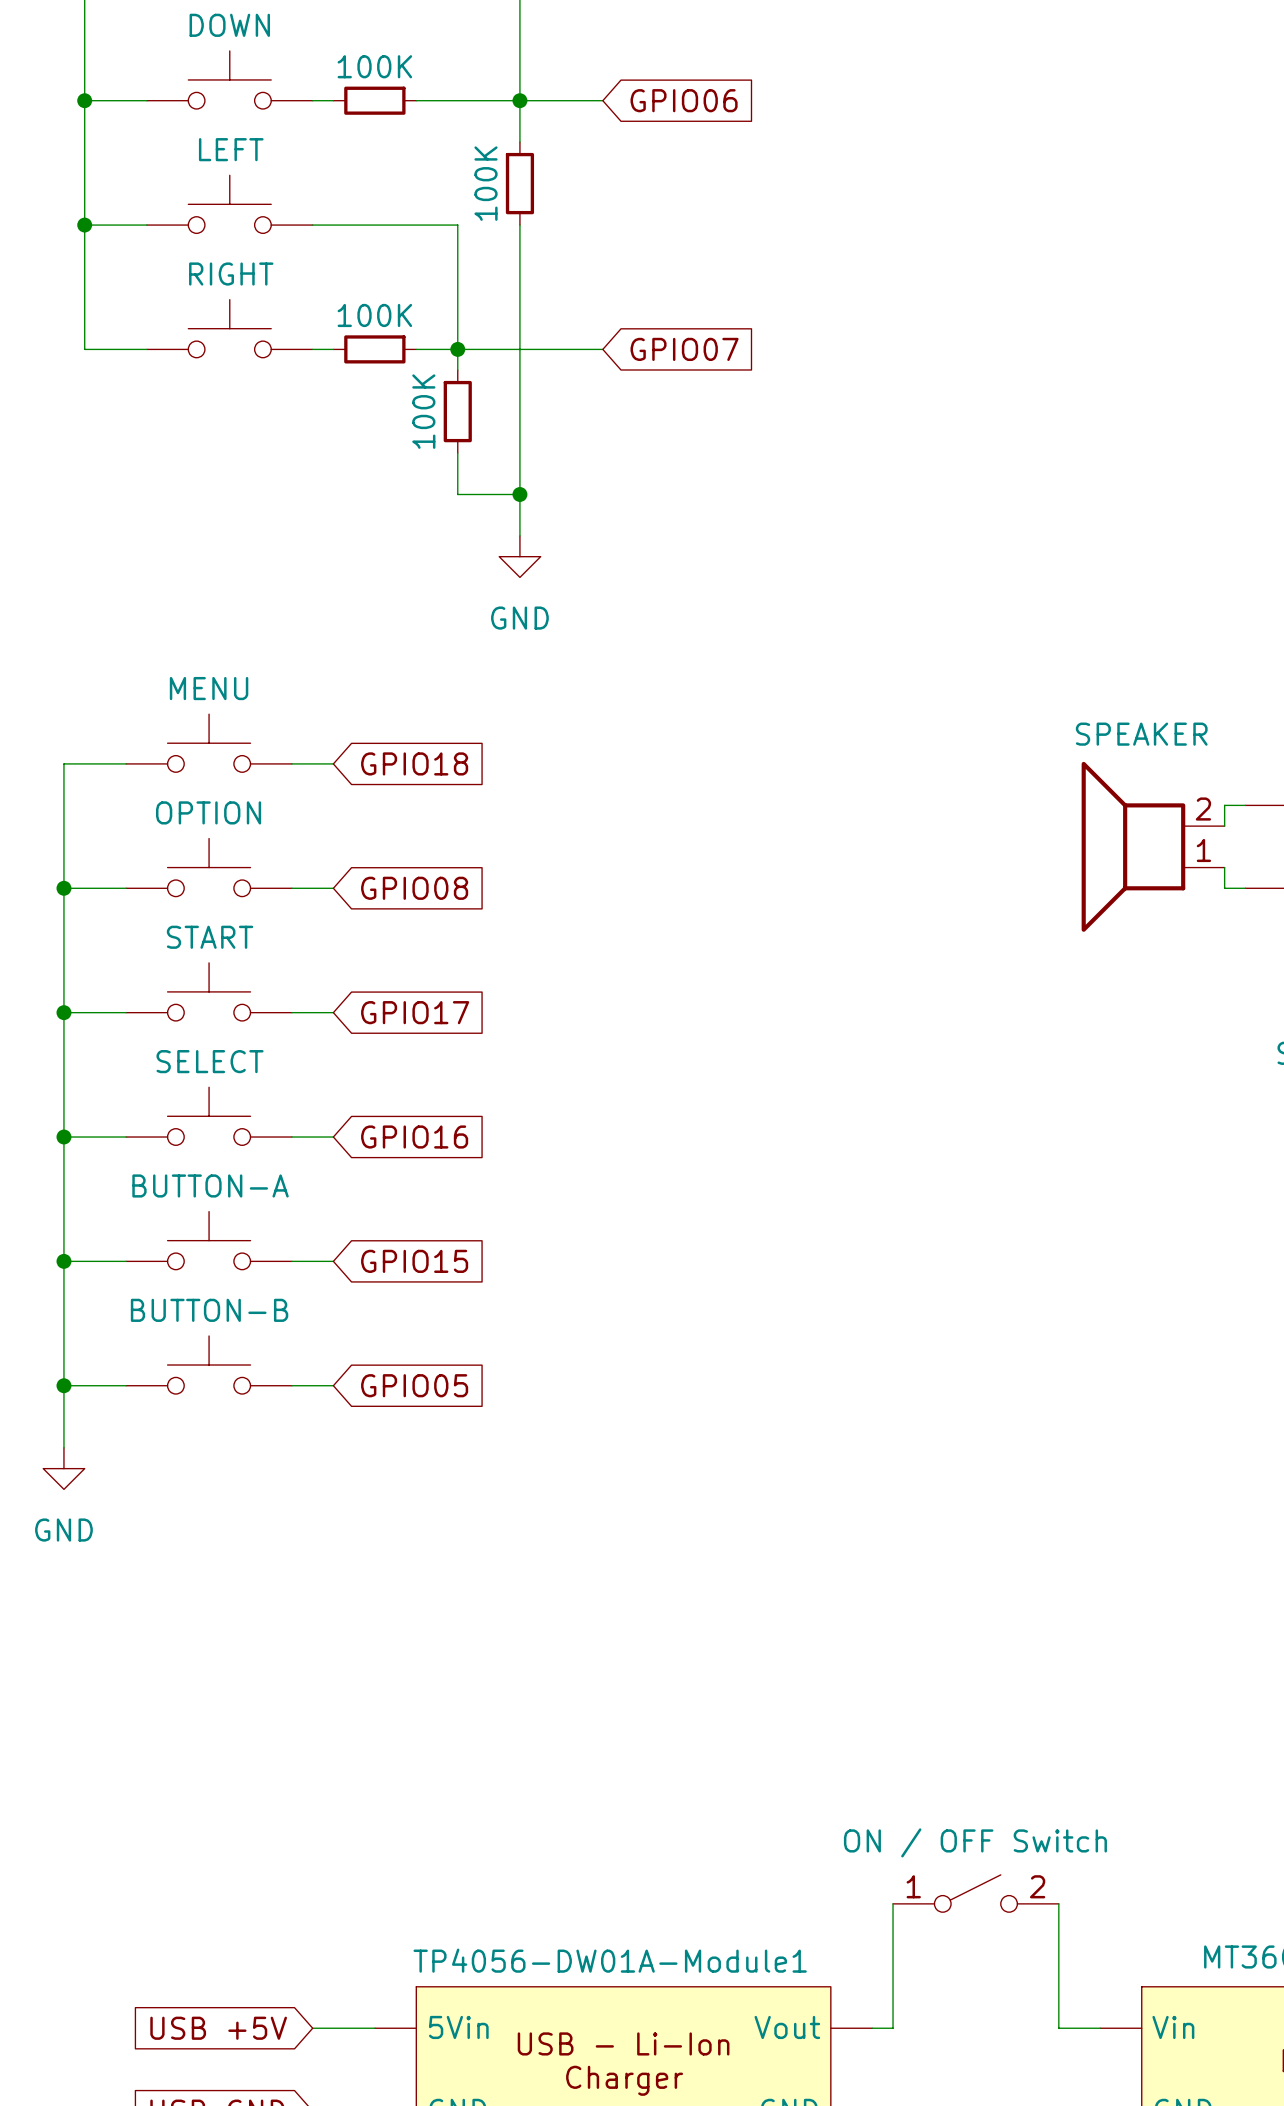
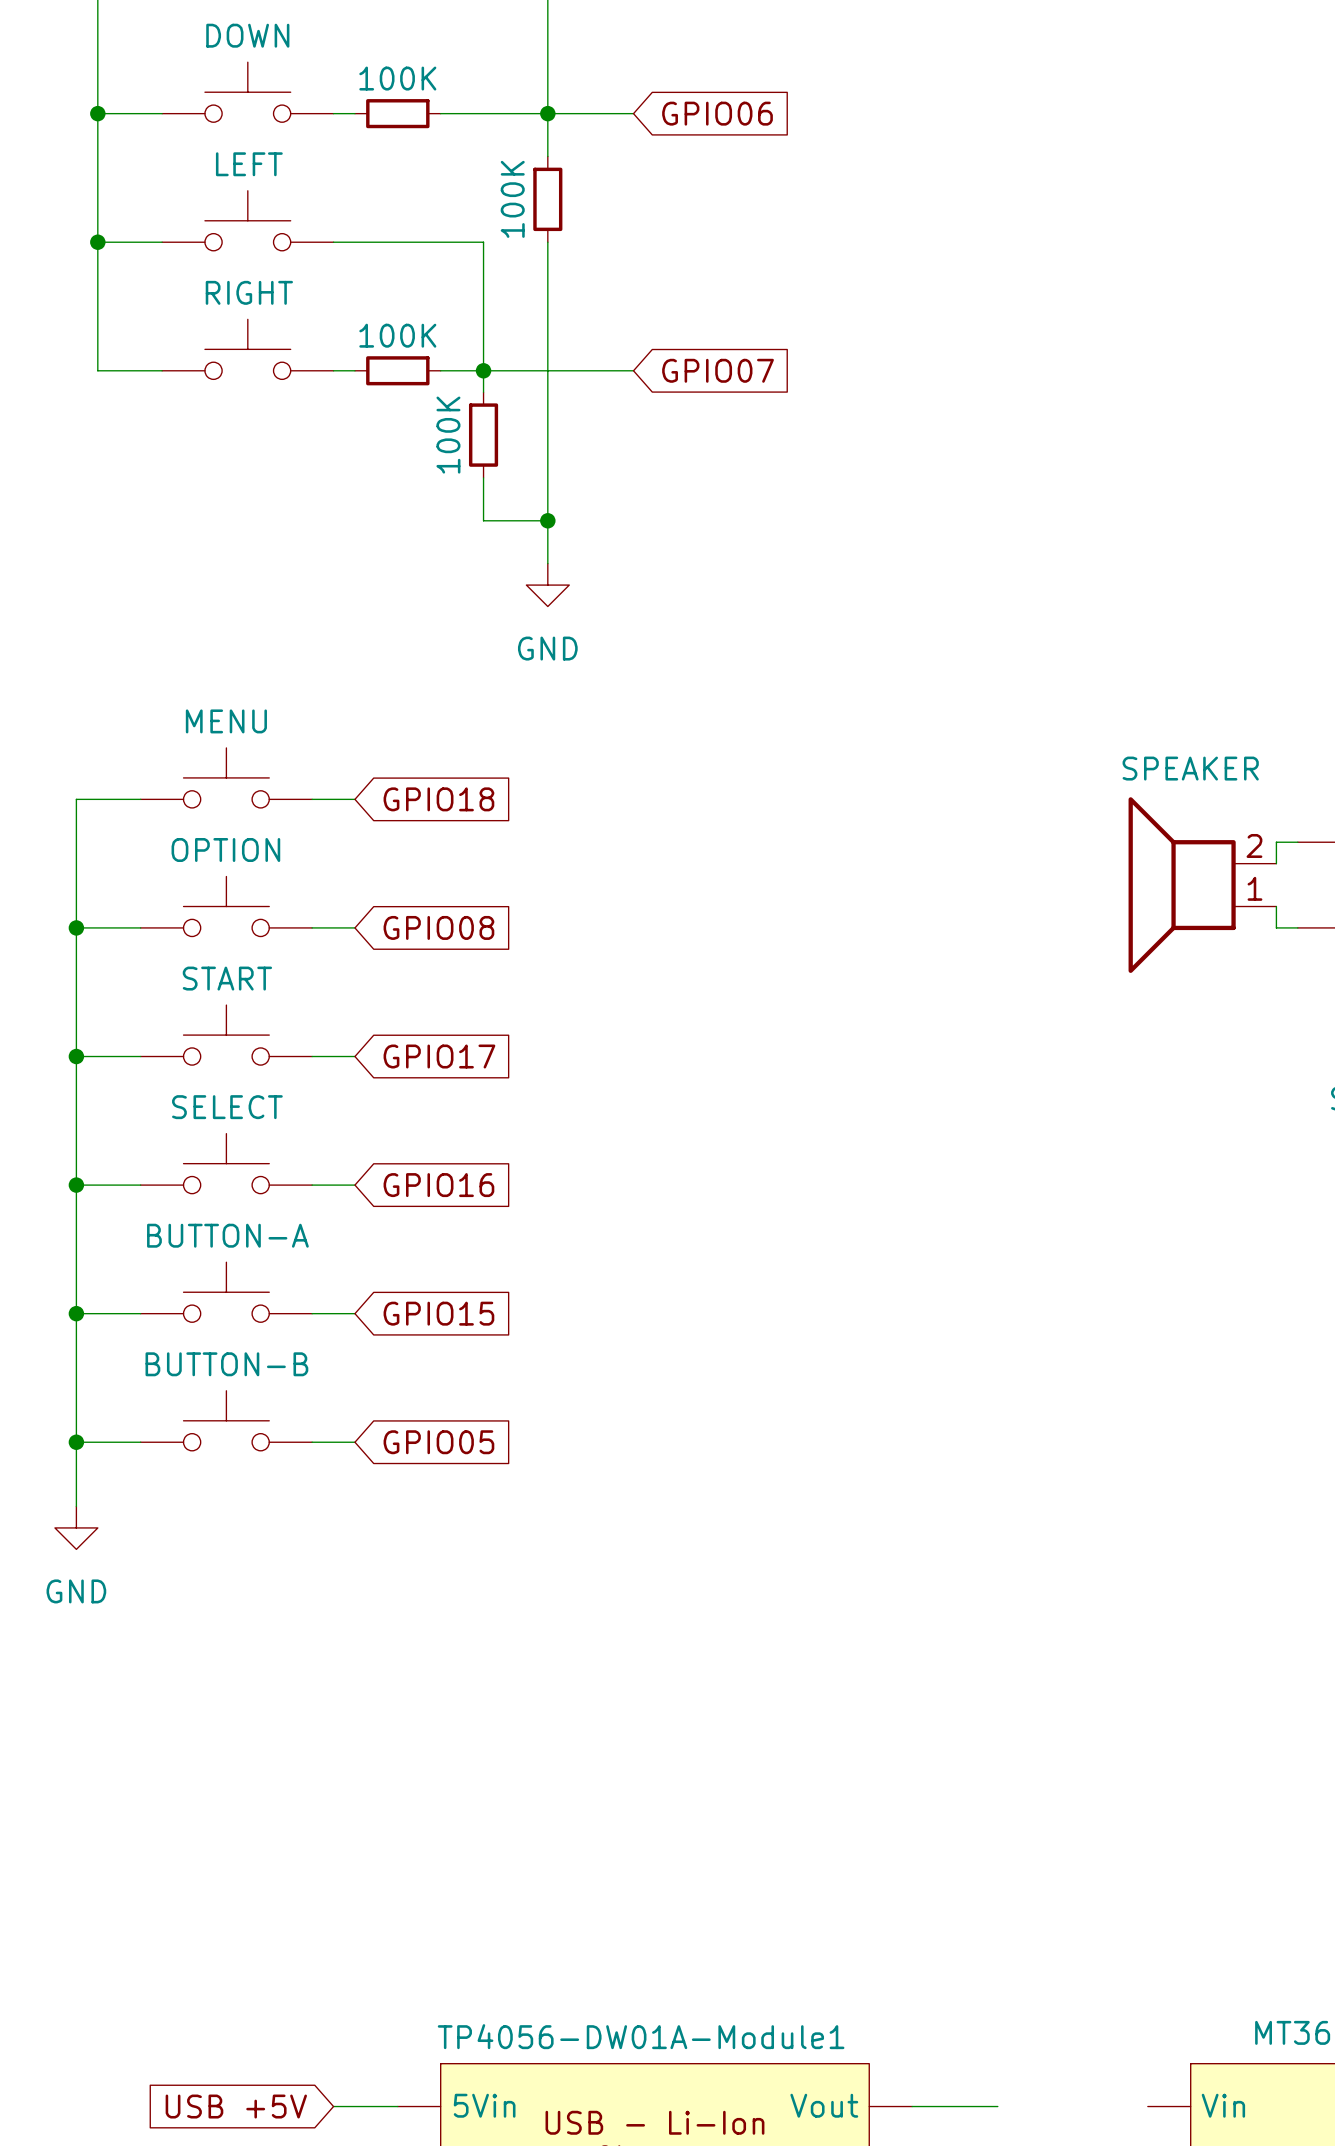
part: ON / OFF Switch (975, 1893) -> none
wire: (893, 1903) (893, 2028) -> (997, 2106) (933, 2106)
wire: (1058, 1903) (1058, 2028) (1100, 2028) -> none

